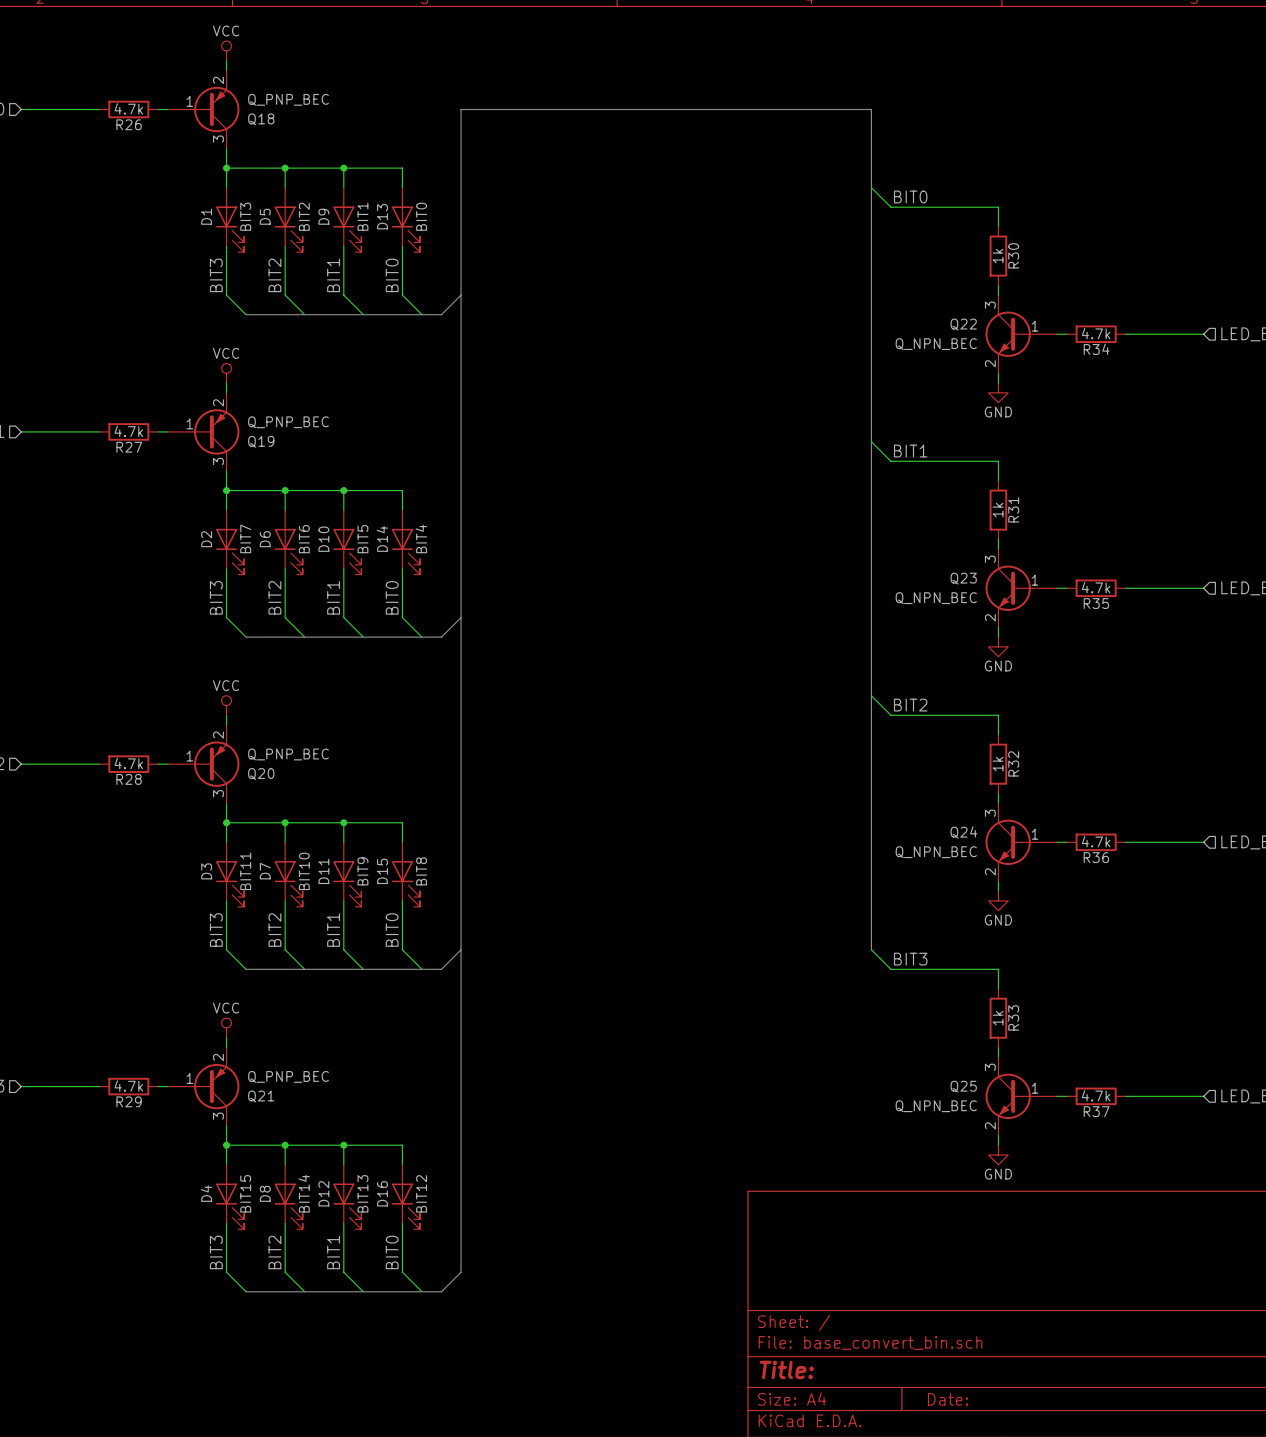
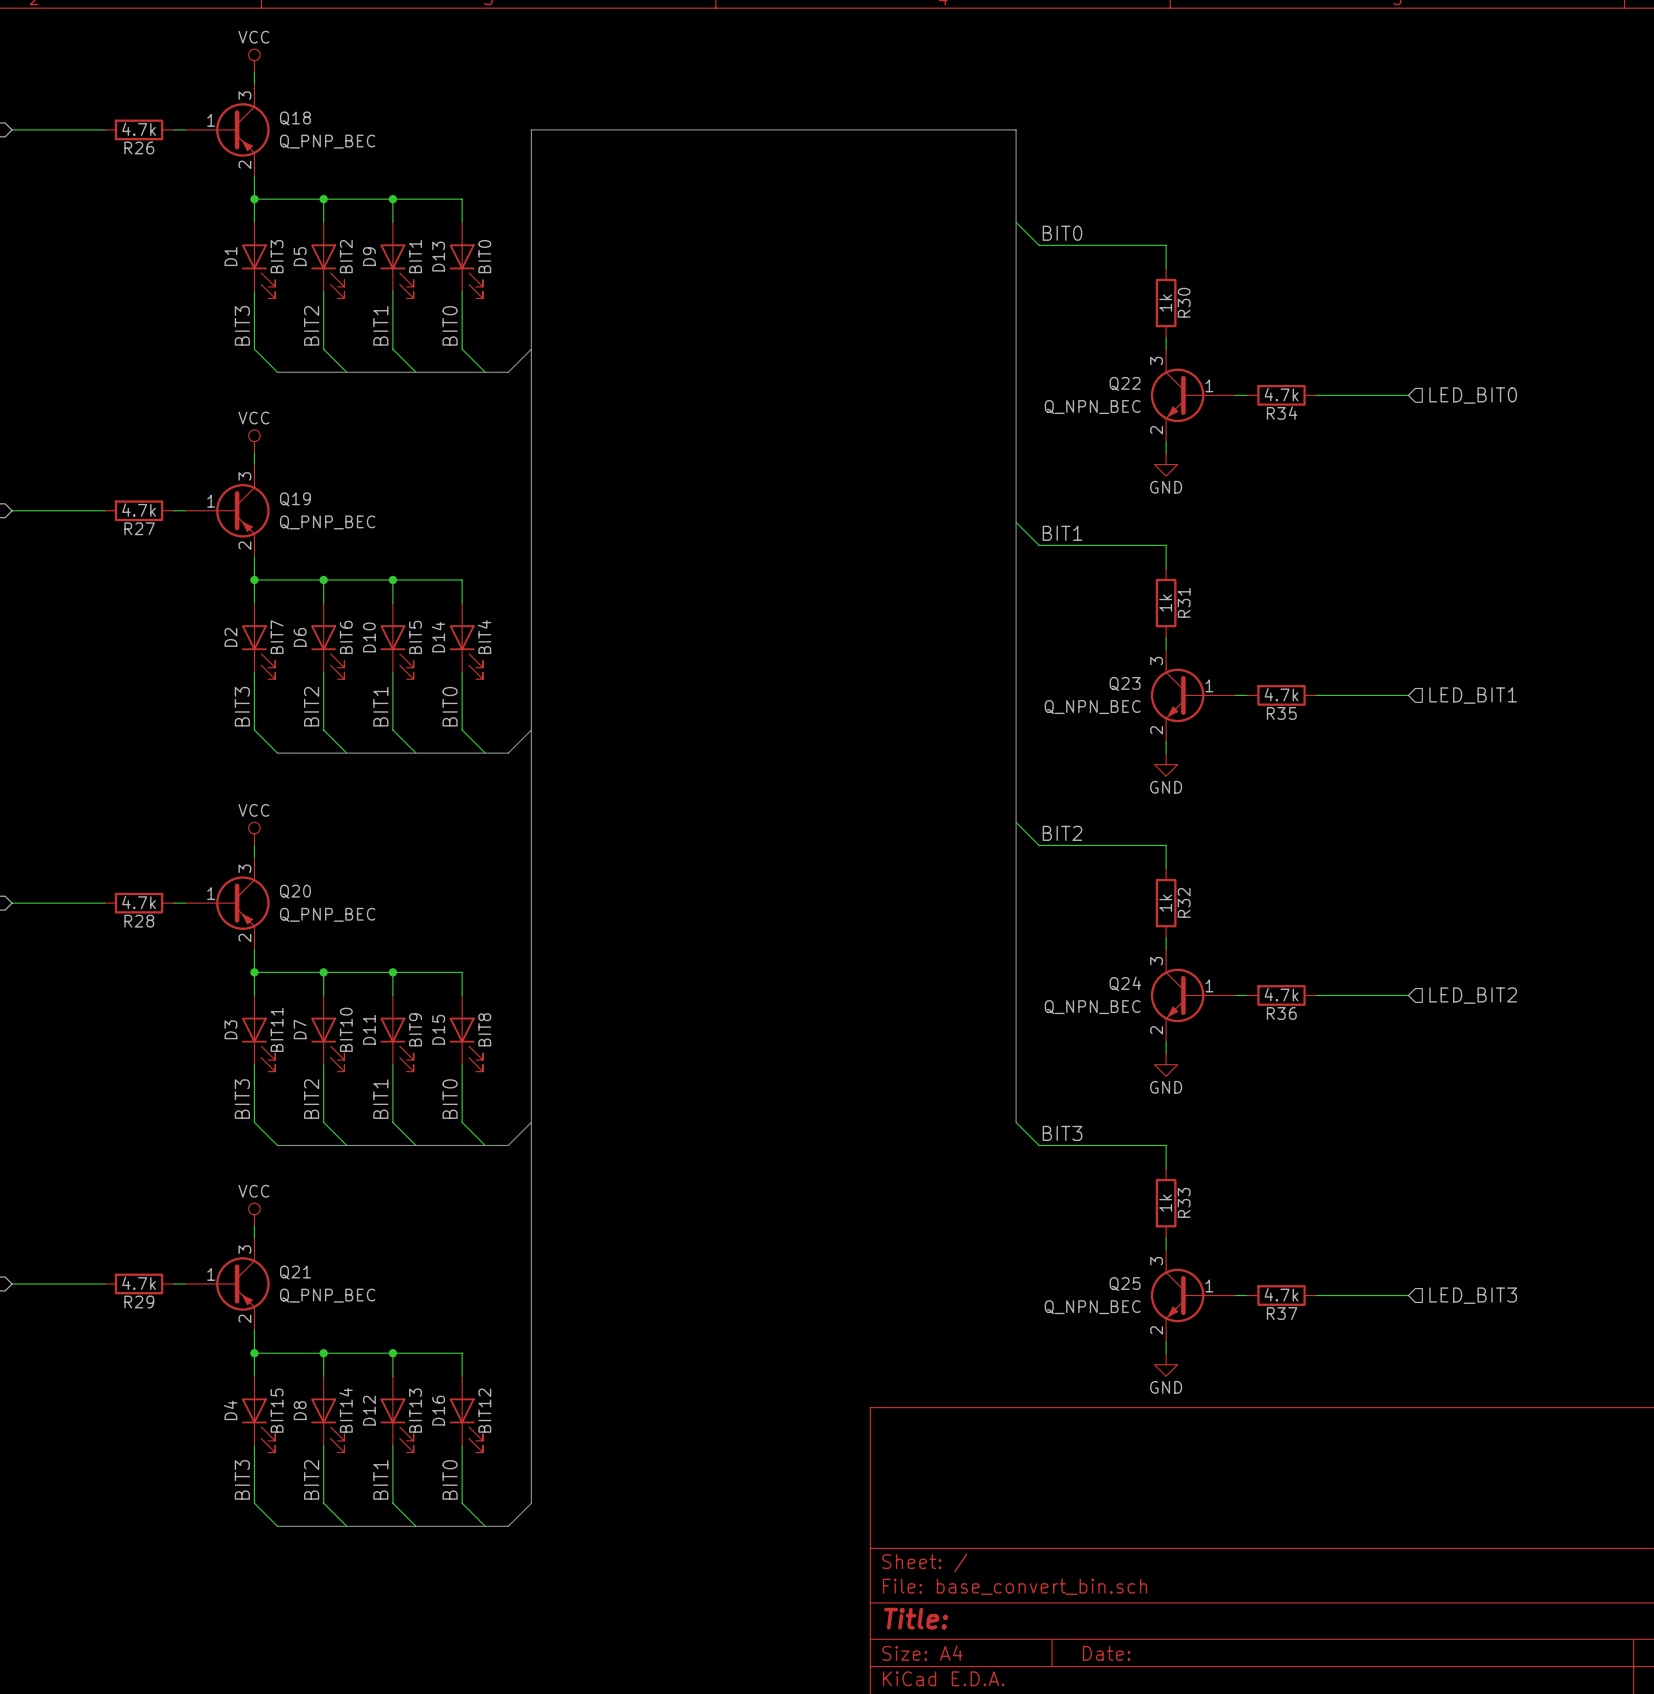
Q18 flip: as is (216, 109) -> up-down (242, 129)
Q19 flip: as is (216, 431) -> up-down (242, 510)
Q20 flip: as is (216, 764) -> up-down (242, 903)
Q21 flip: as is (216, 1086) -> up-down (242, 1283)

